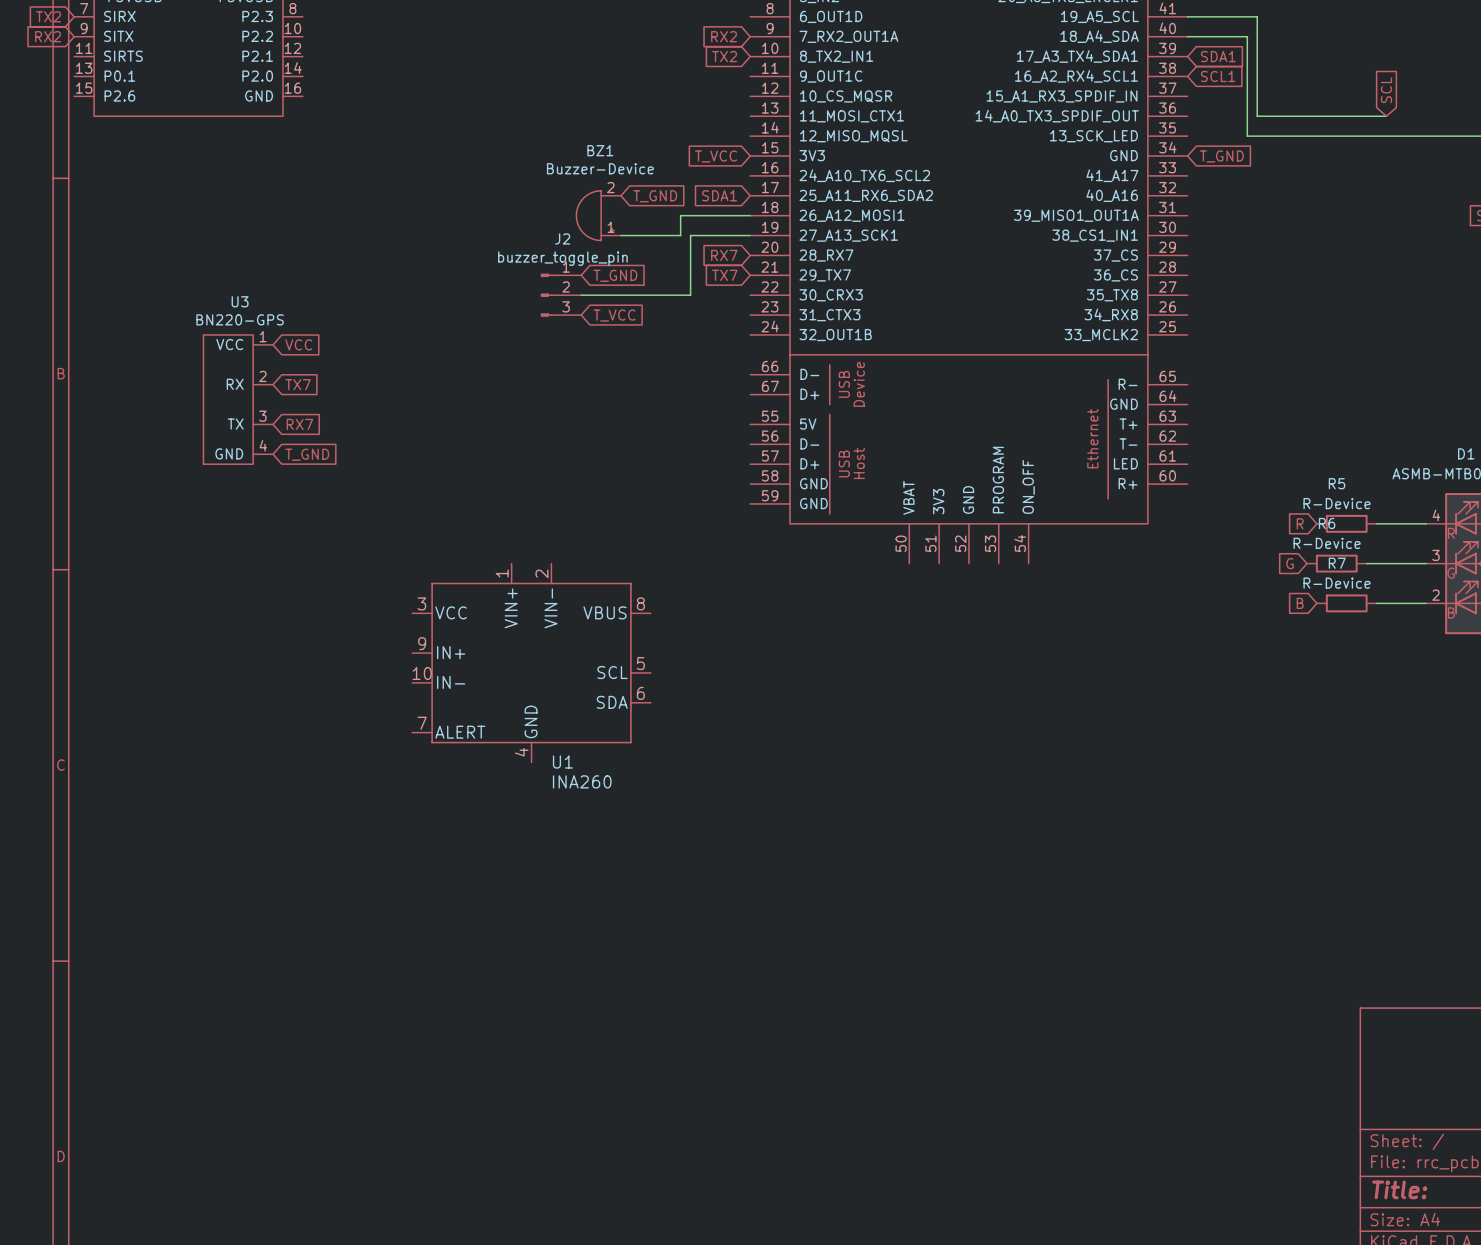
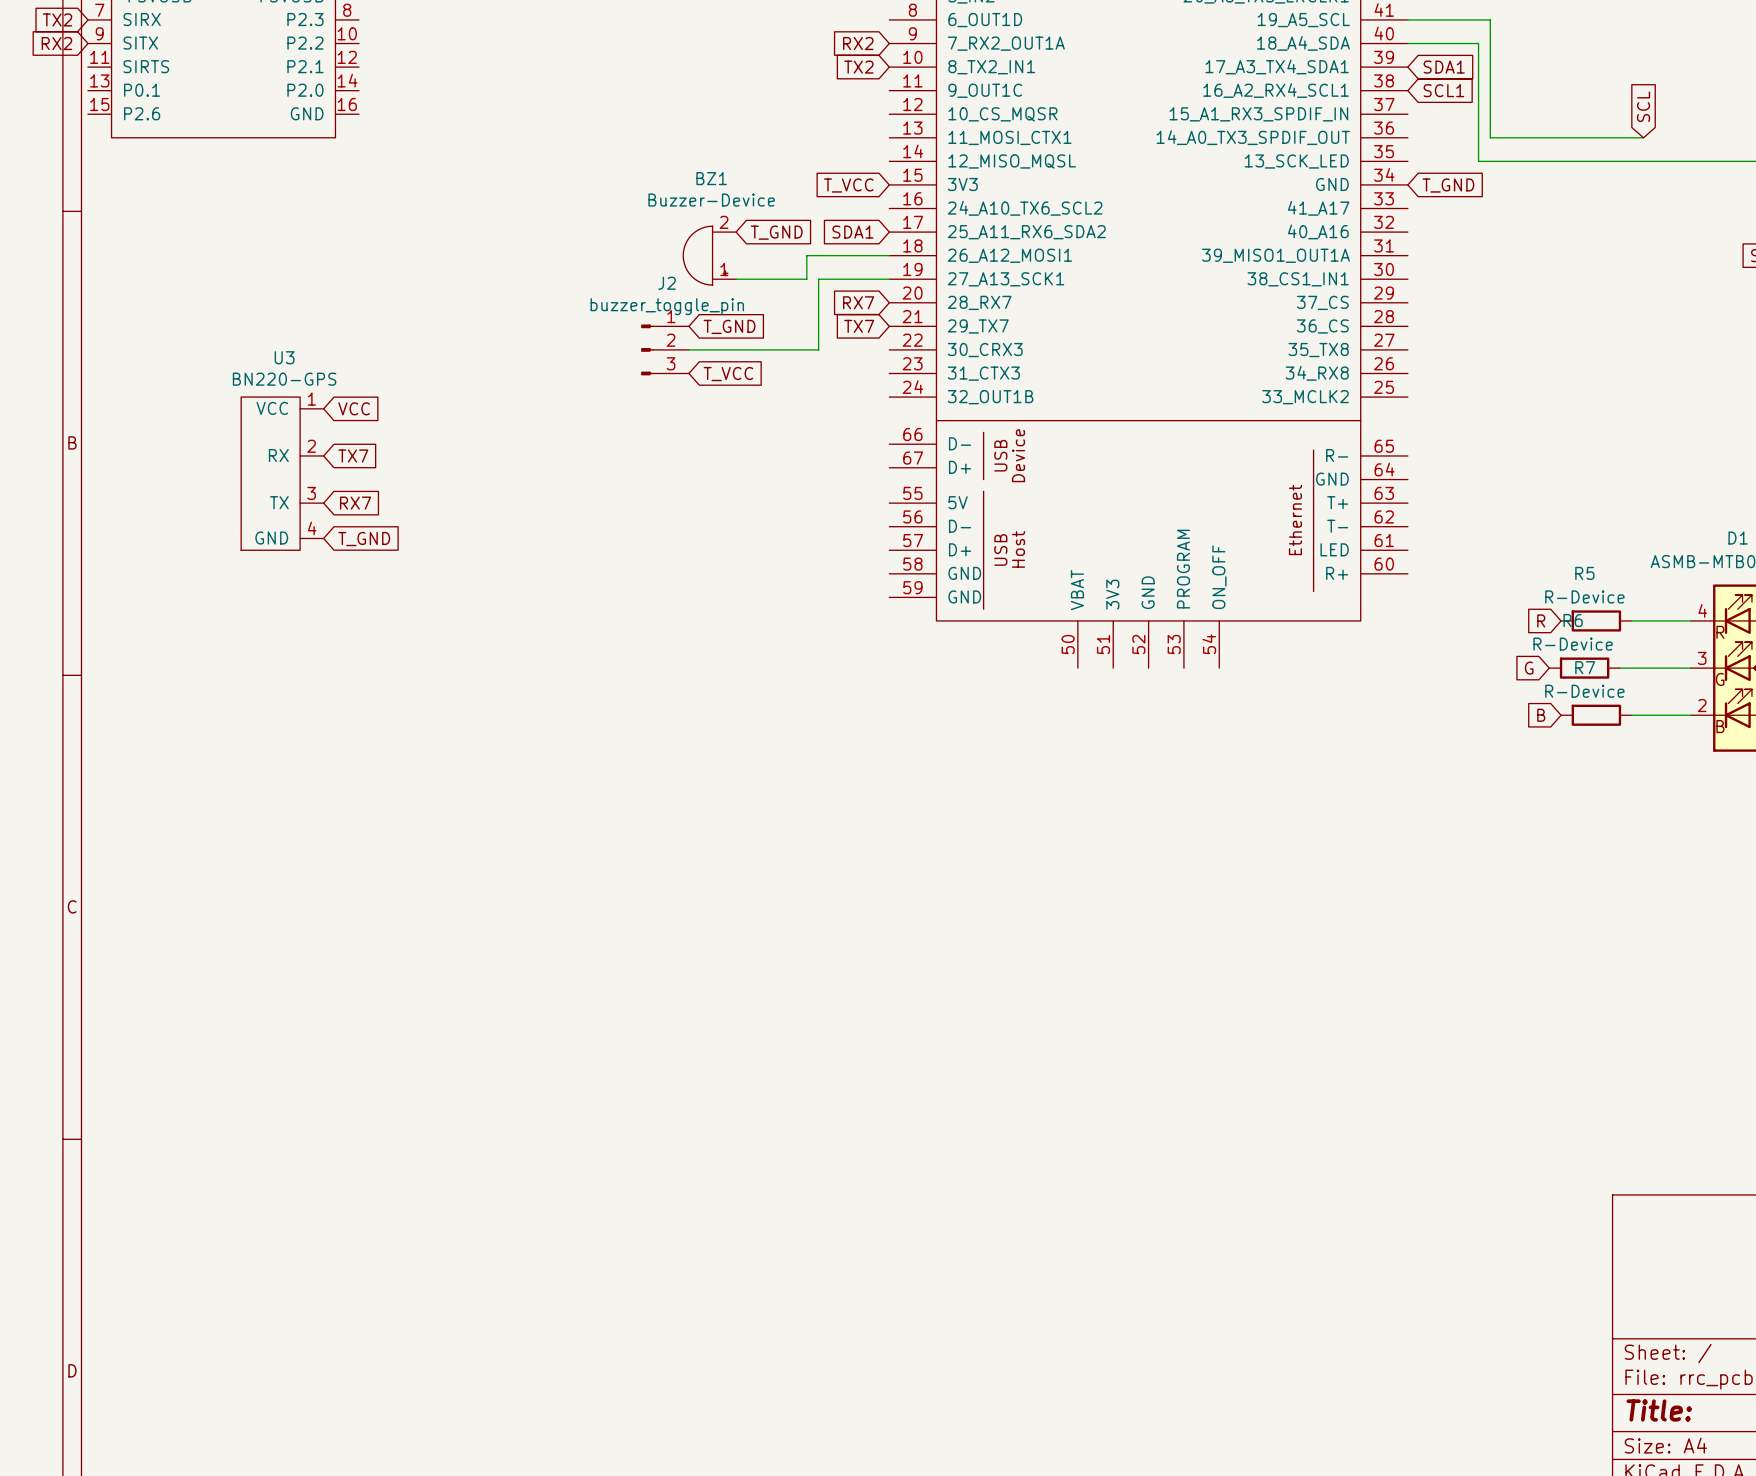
U1: INA260 (531, 663) -> none

